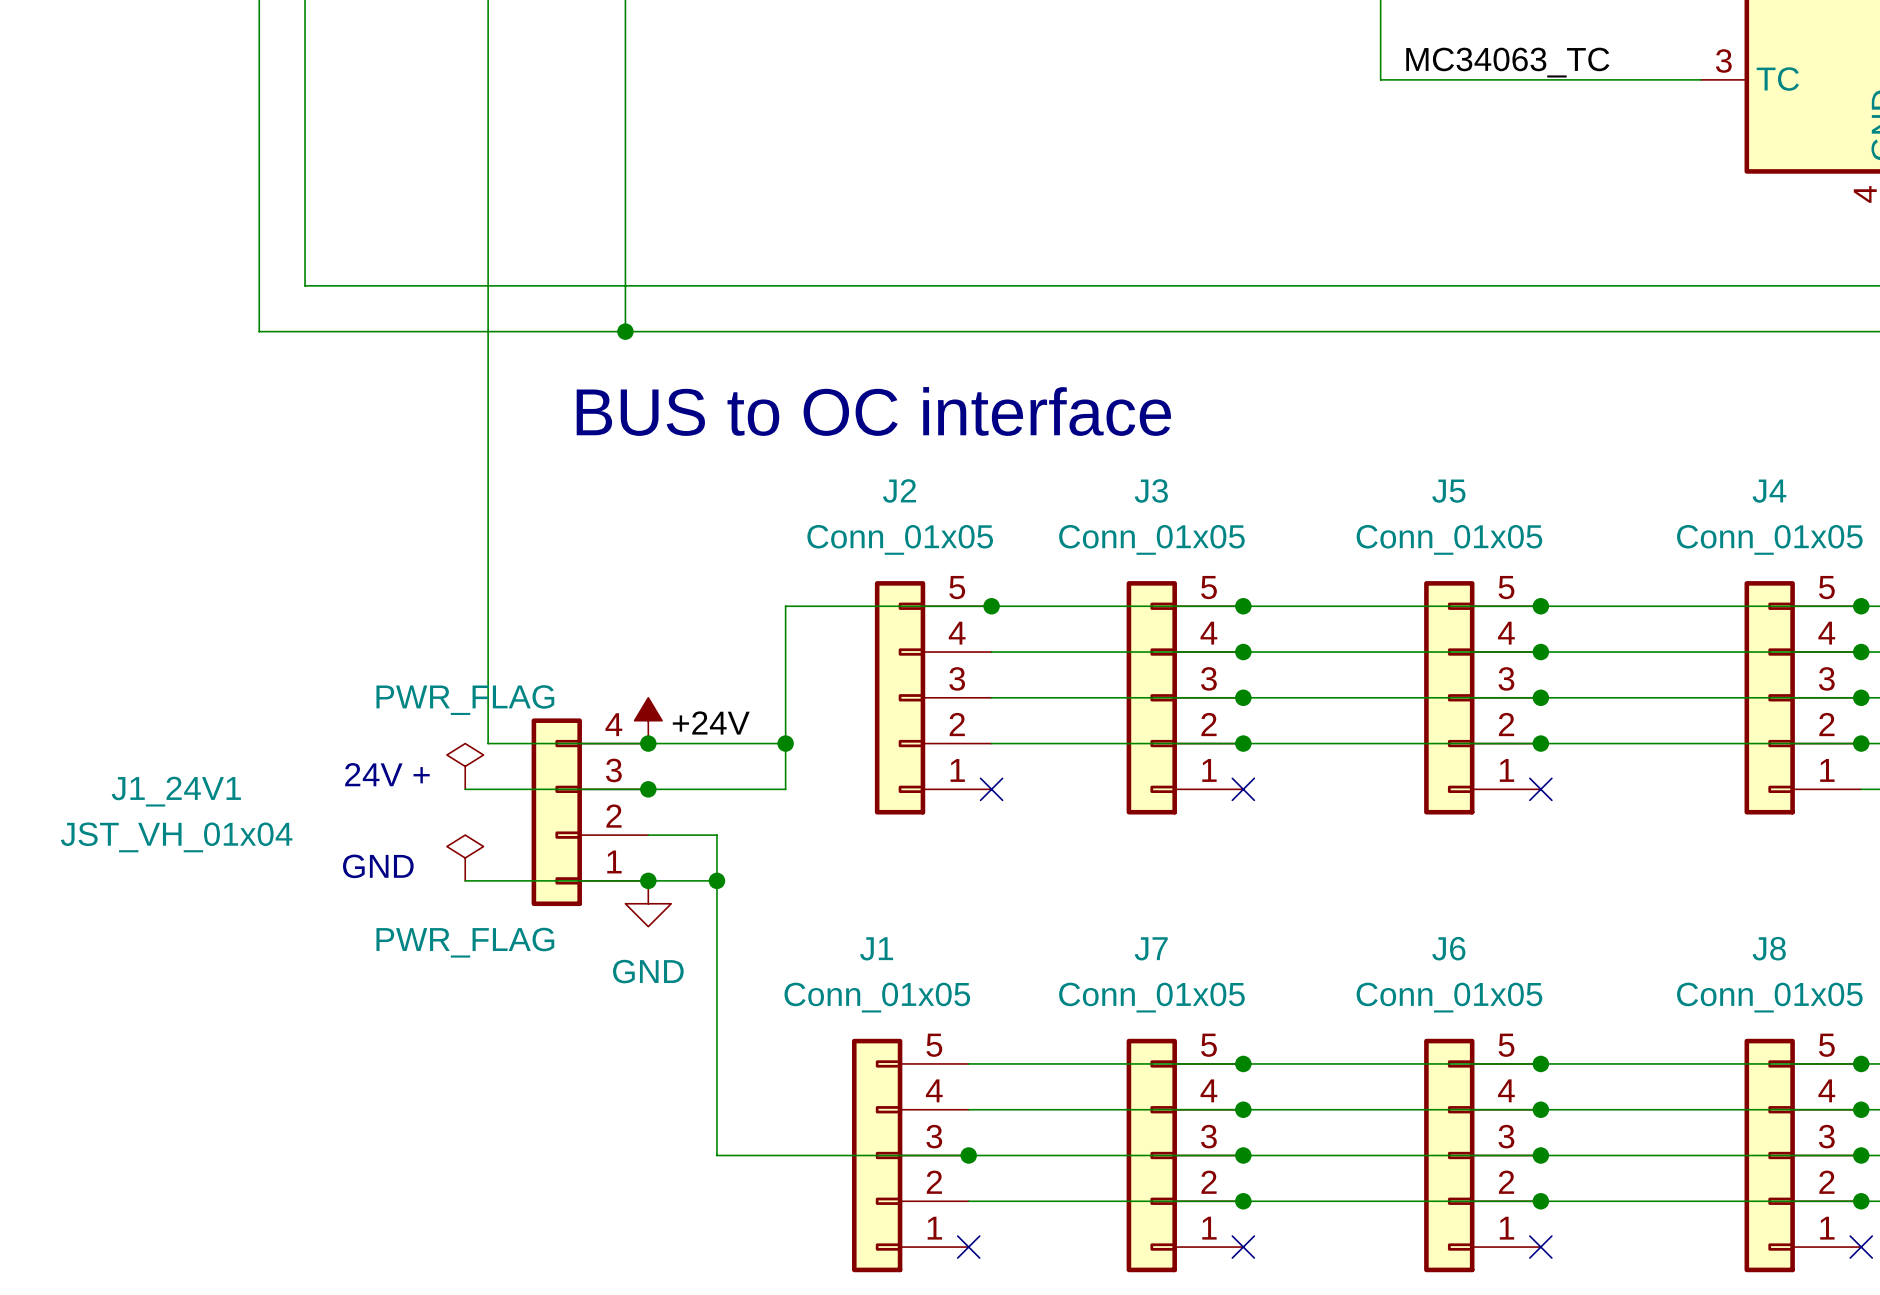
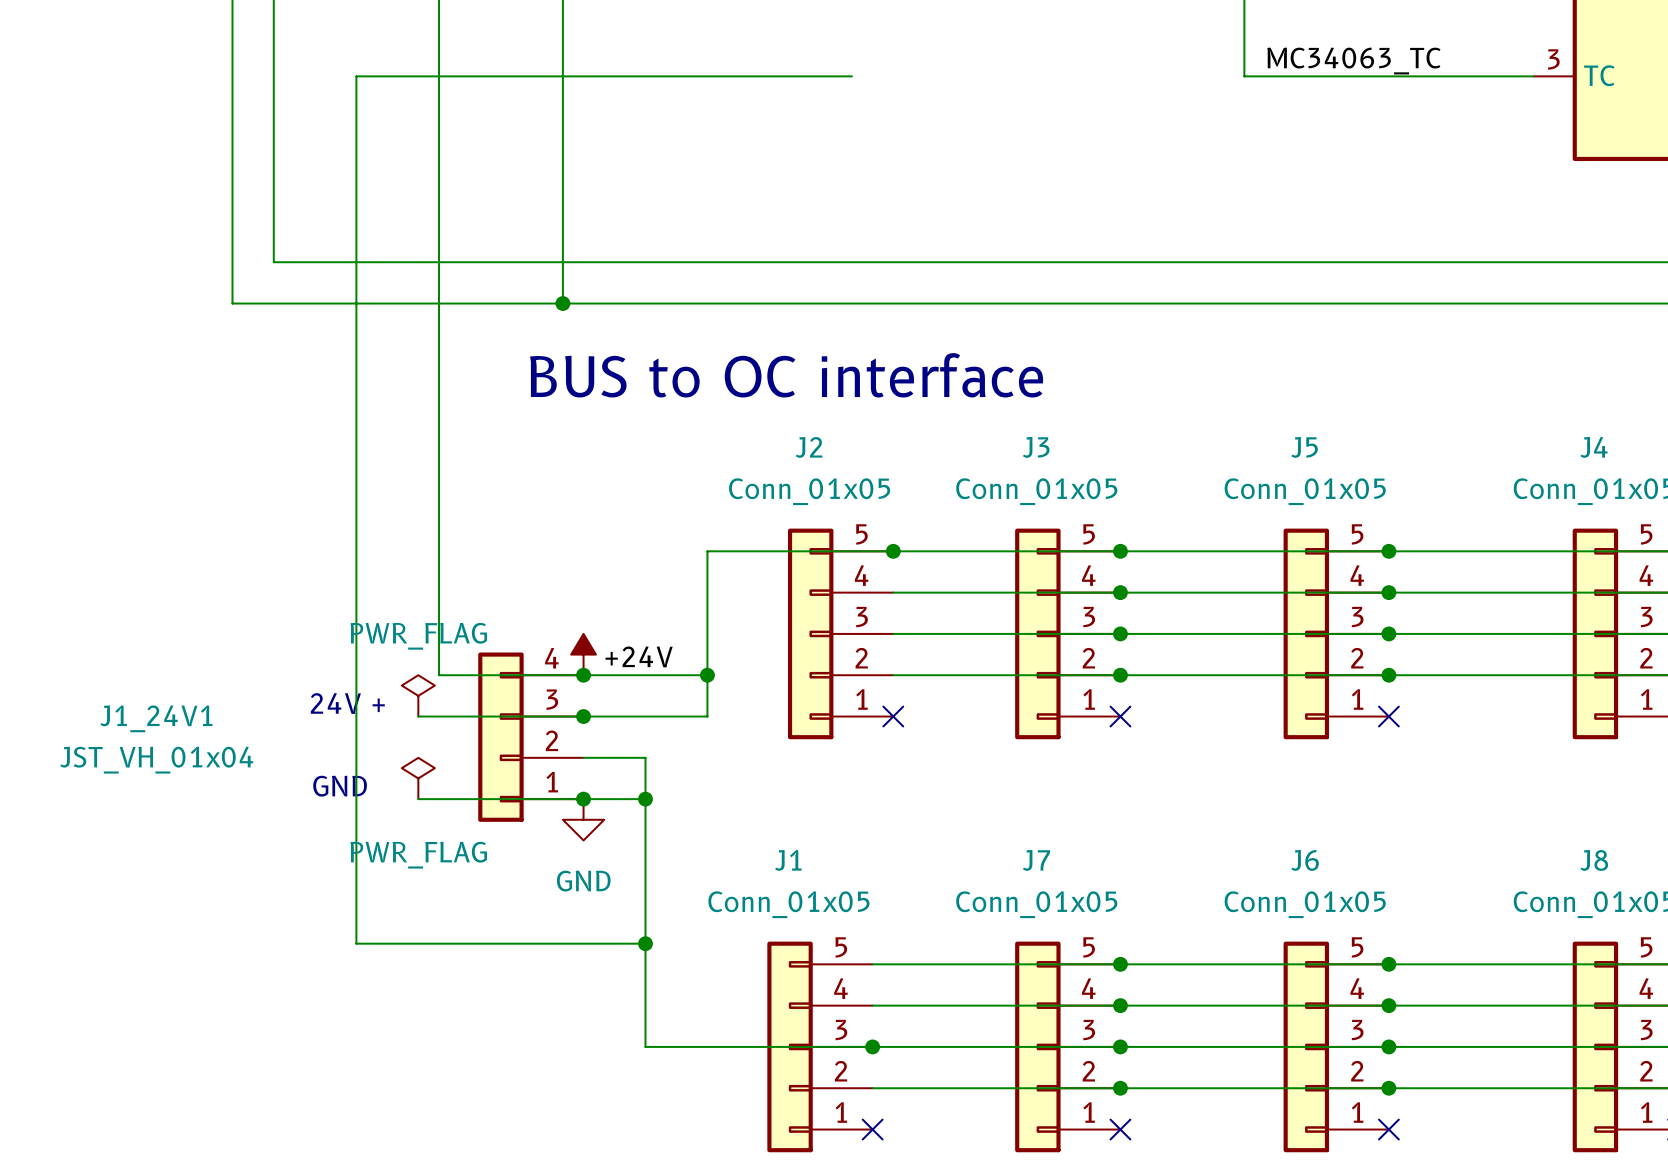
wire: none -> (852, 76) (356, 76) (356, 943) (645, 943)
junction: none -> (645, 943)

